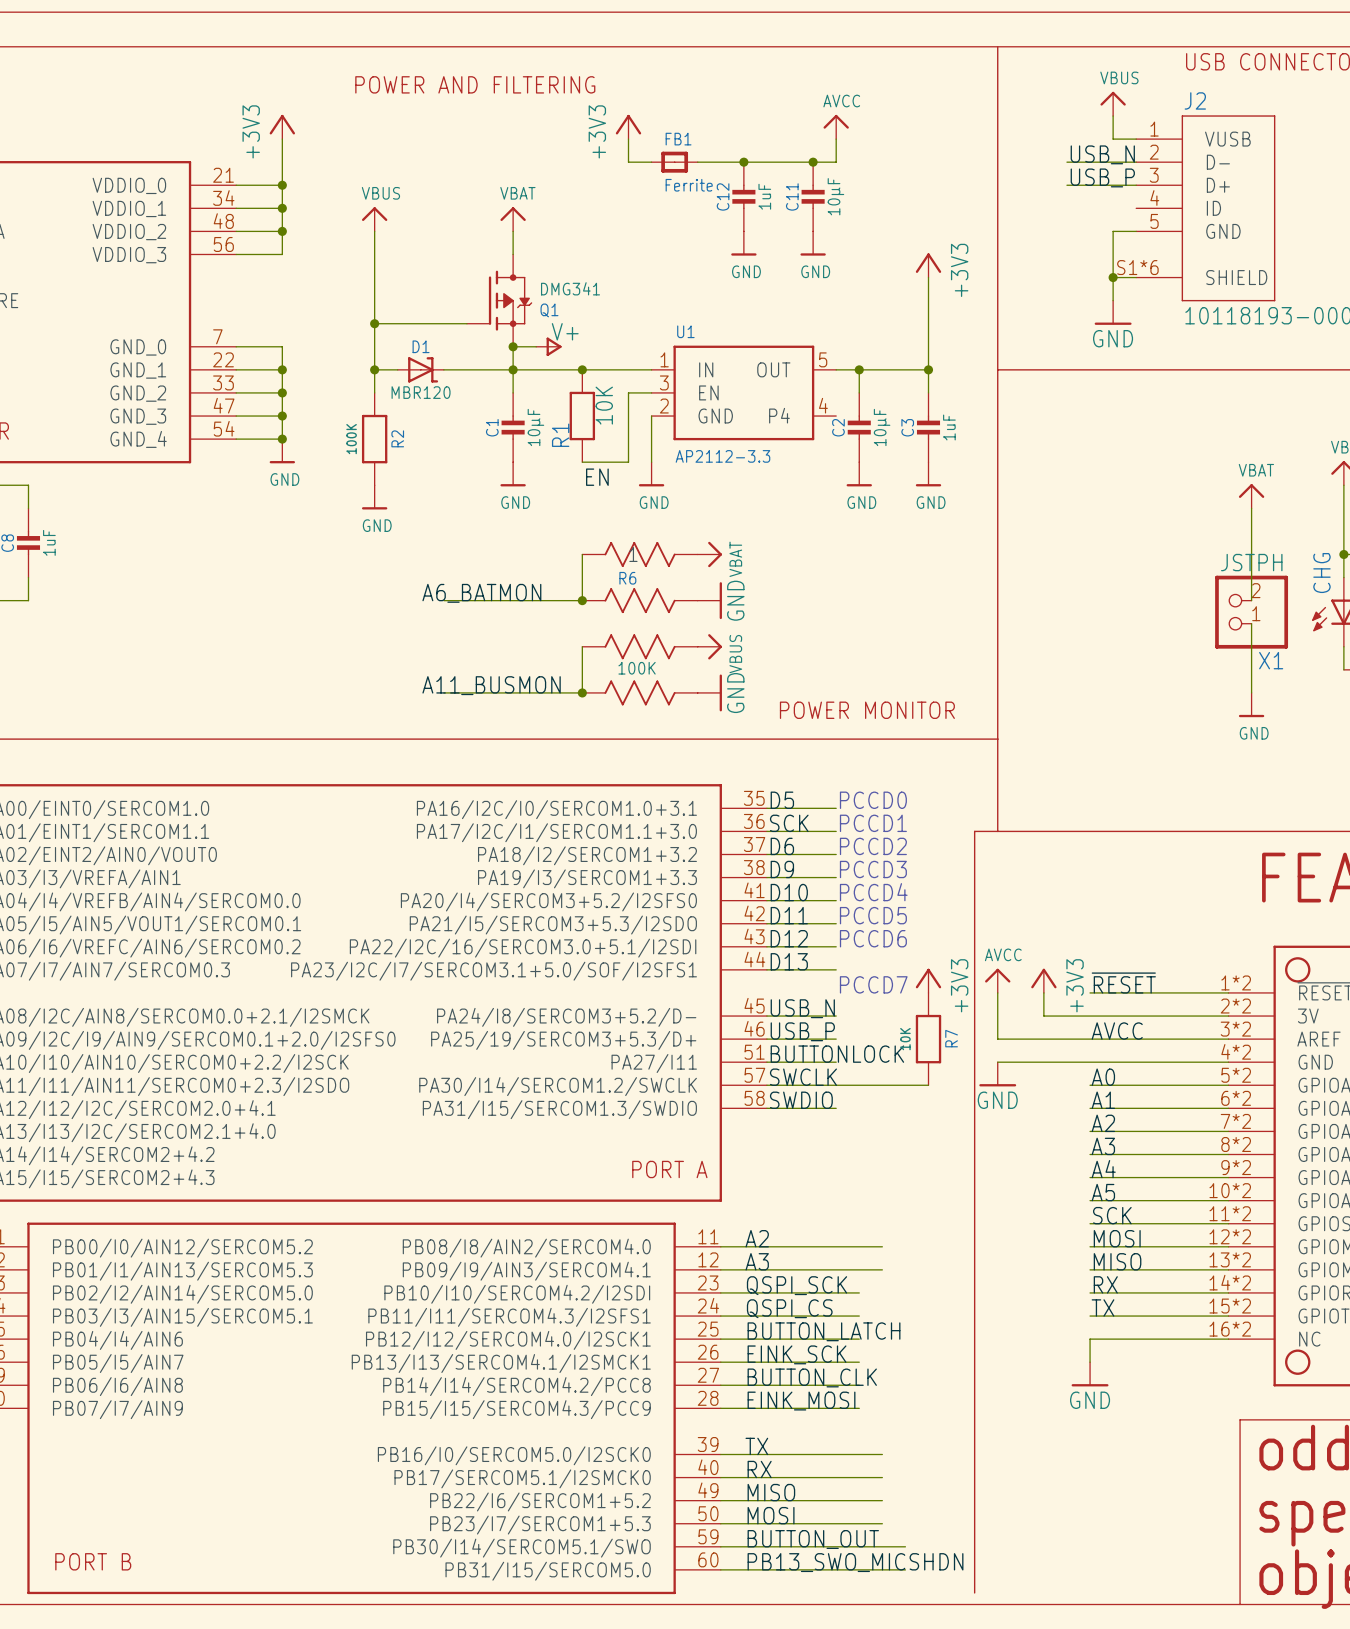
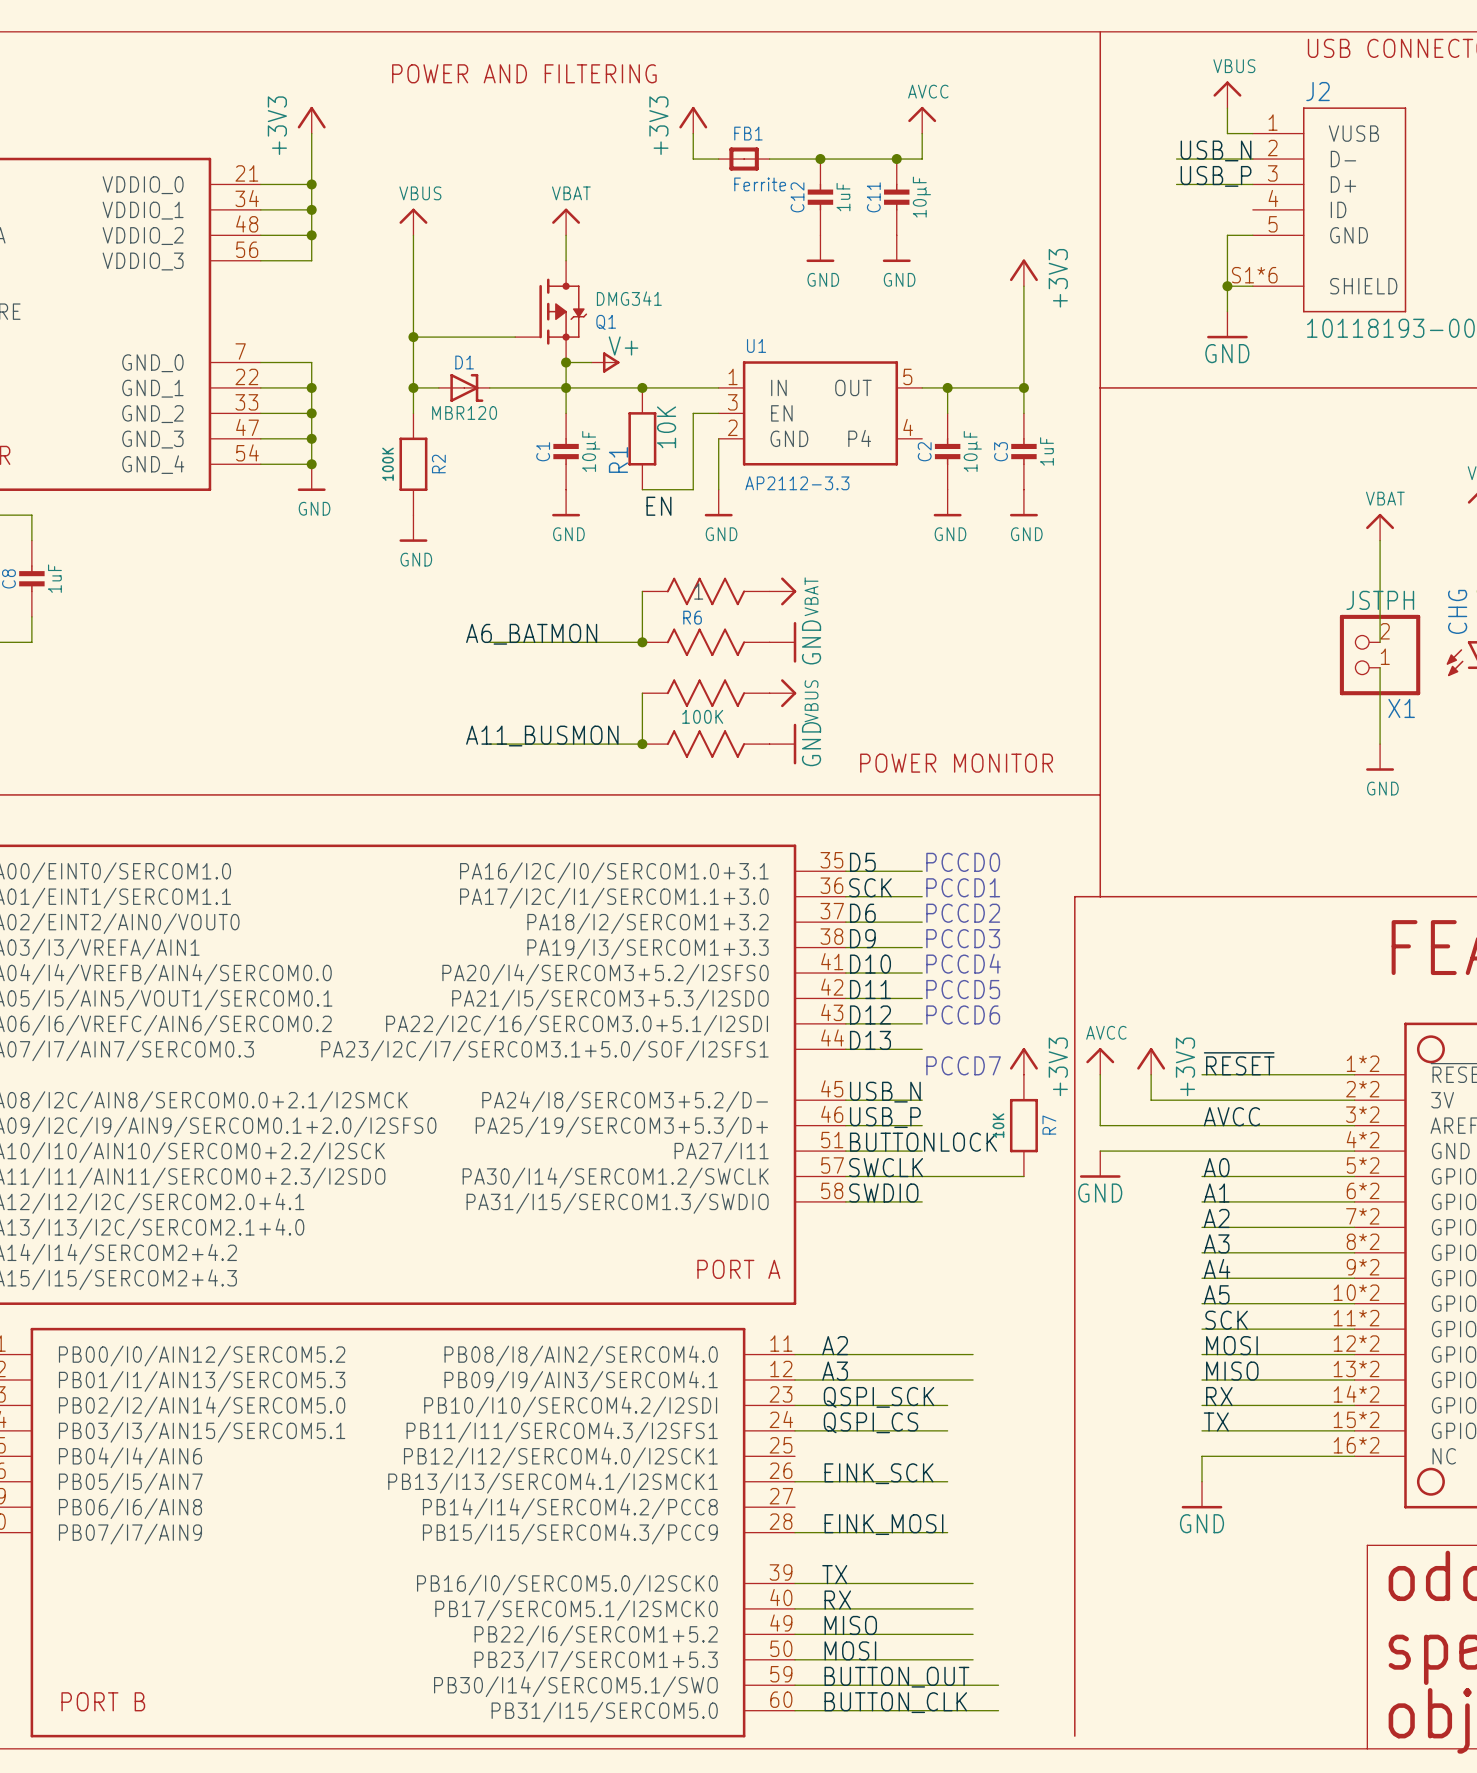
label: BUTTON_LATCH (824, 1331) -> none
wire: (720, 1339) (859, 1339) -> none
label: BUTTON_CLK (812, 1377) -> none
wire: (720, 1385) (859, 1385) -> none
label: PB13_SWO_MICSHDN (855, 1562) -> BUTTON_CLK (895, 1702)

